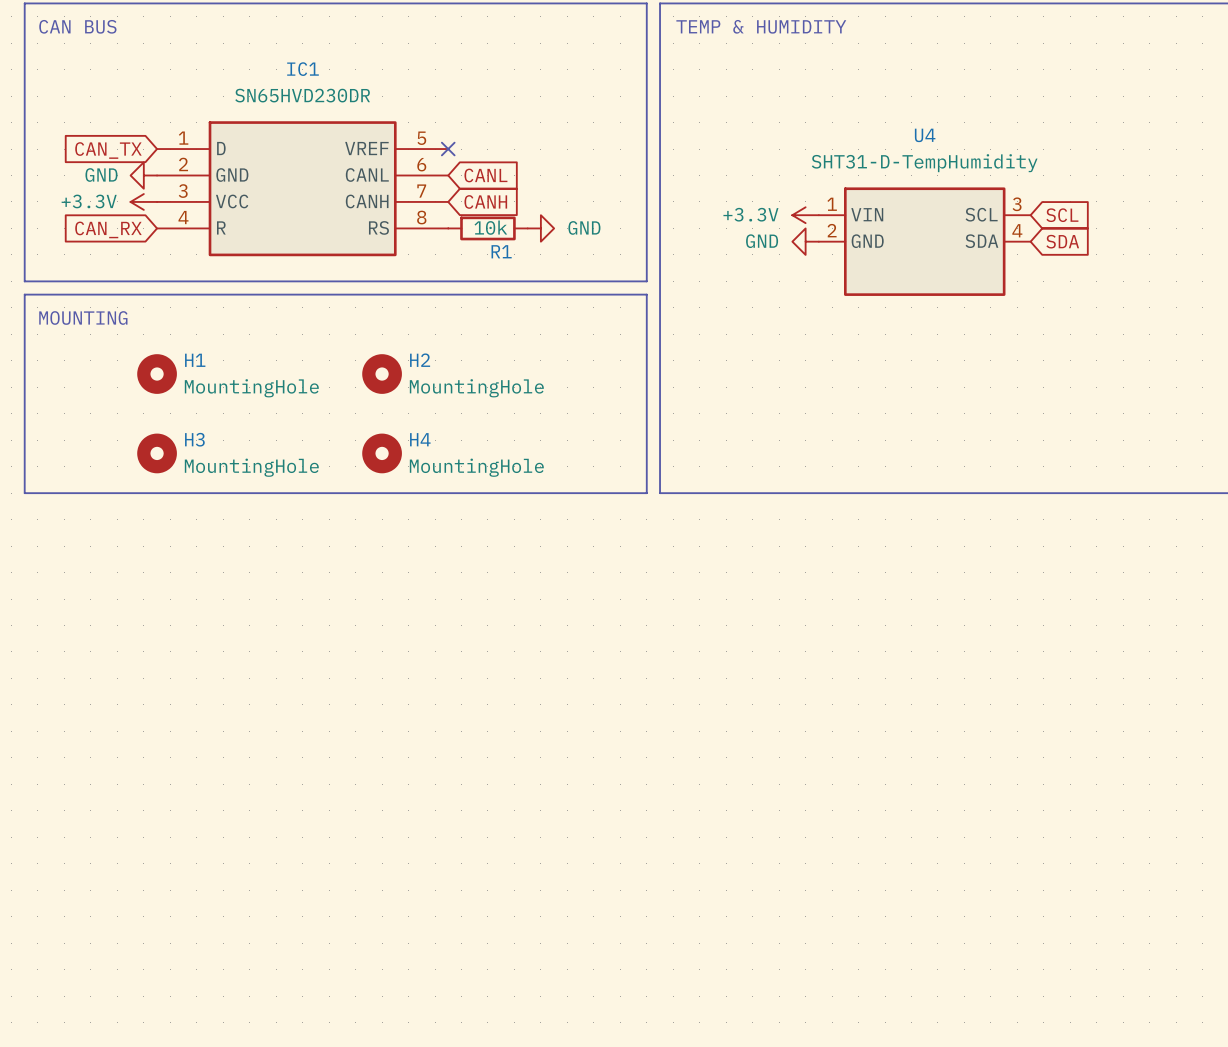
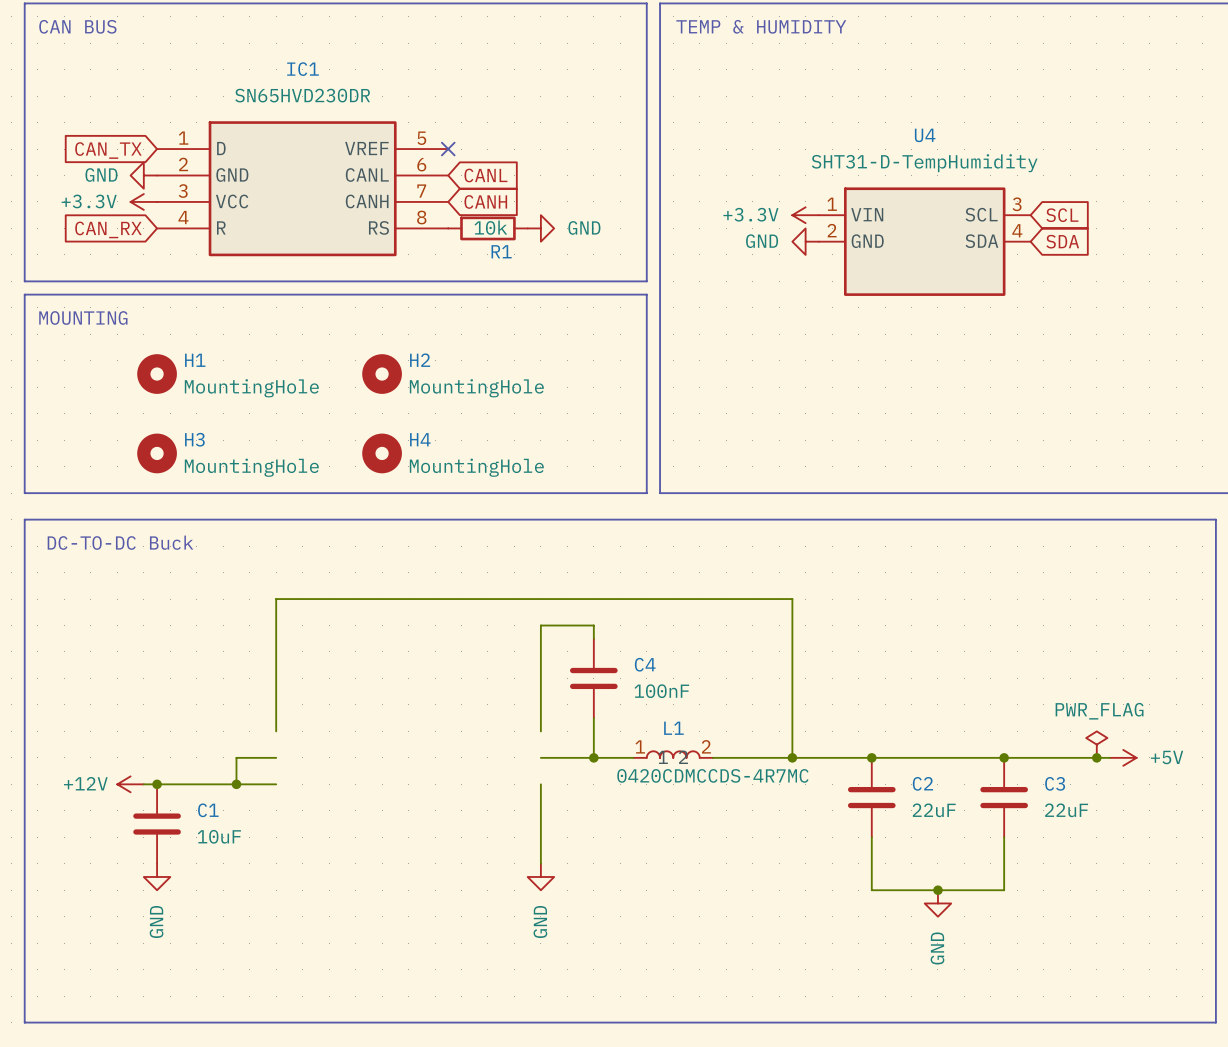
line: none -> (24, 519) (1215, 519) (1215, 1022) (24, 1022) (24, 519)
text: none -> DC-TO-DC Buck (120, 542)
wire: none -> (593, 638) (593, 625) (540, 625) (540, 731)
C4: none -> 100nF (593, 678)
wire: none -> (593, 718) (593, 757)
wire: none -> (276, 731) (276, 599) (792, 599) (792, 757)
power symbol: none -> PWR_FLAG (1096, 744)
L1: none -> 0420CDMCCDS-4R7MC (673, 754)
wire: none -> (276, 757) (236, 757) (236, 784)
wire: none -> (540, 757) (633, 757)
junction: none -> (593, 757)
wire: none -> (712, 757) (1110, 757)
junction: none -> (792, 757)
junction: none -> (871, 757)
junction: none -> (1004, 757)
junction: none -> (1096, 757)
power symbol: none -> +5V (1123, 757)
power symbol: none -> +12V (130, 784)
wire: none -> (143, 784) (276, 784)
junction: none -> (157, 784)
junction: none -> (236, 784)
wire: none -> (540, 784) (540, 863)
C2: none -> 22uF (871, 797)
C3: none -> 22uF (1004, 797)
C1: none -> 10uF (157, 824)
wire: none -> (871, 837) (871, 890) (1004, 890) (1004, 837)
power symbol: none -> GND (157, 876)
power symbol: none -> GND (540, 876)
junction: none -> (937, 890)
power symbol: none -> GND (937, 903)

